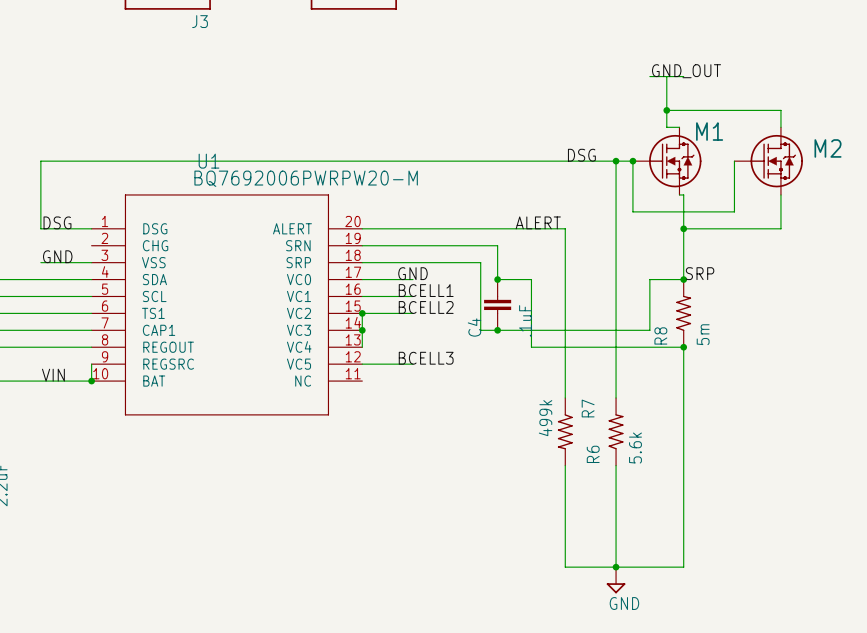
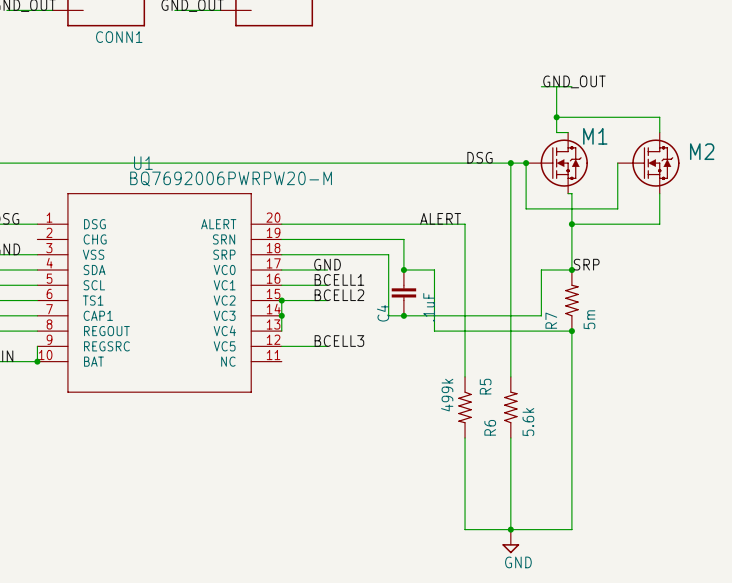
J3 name: J3 (200, 21) -> CONN1 (119, 37)
R8 name: R8 (660, 335) -> R7 (551, 320)
R7 name: R7 (588, 408) -> R5 (485, 386)

